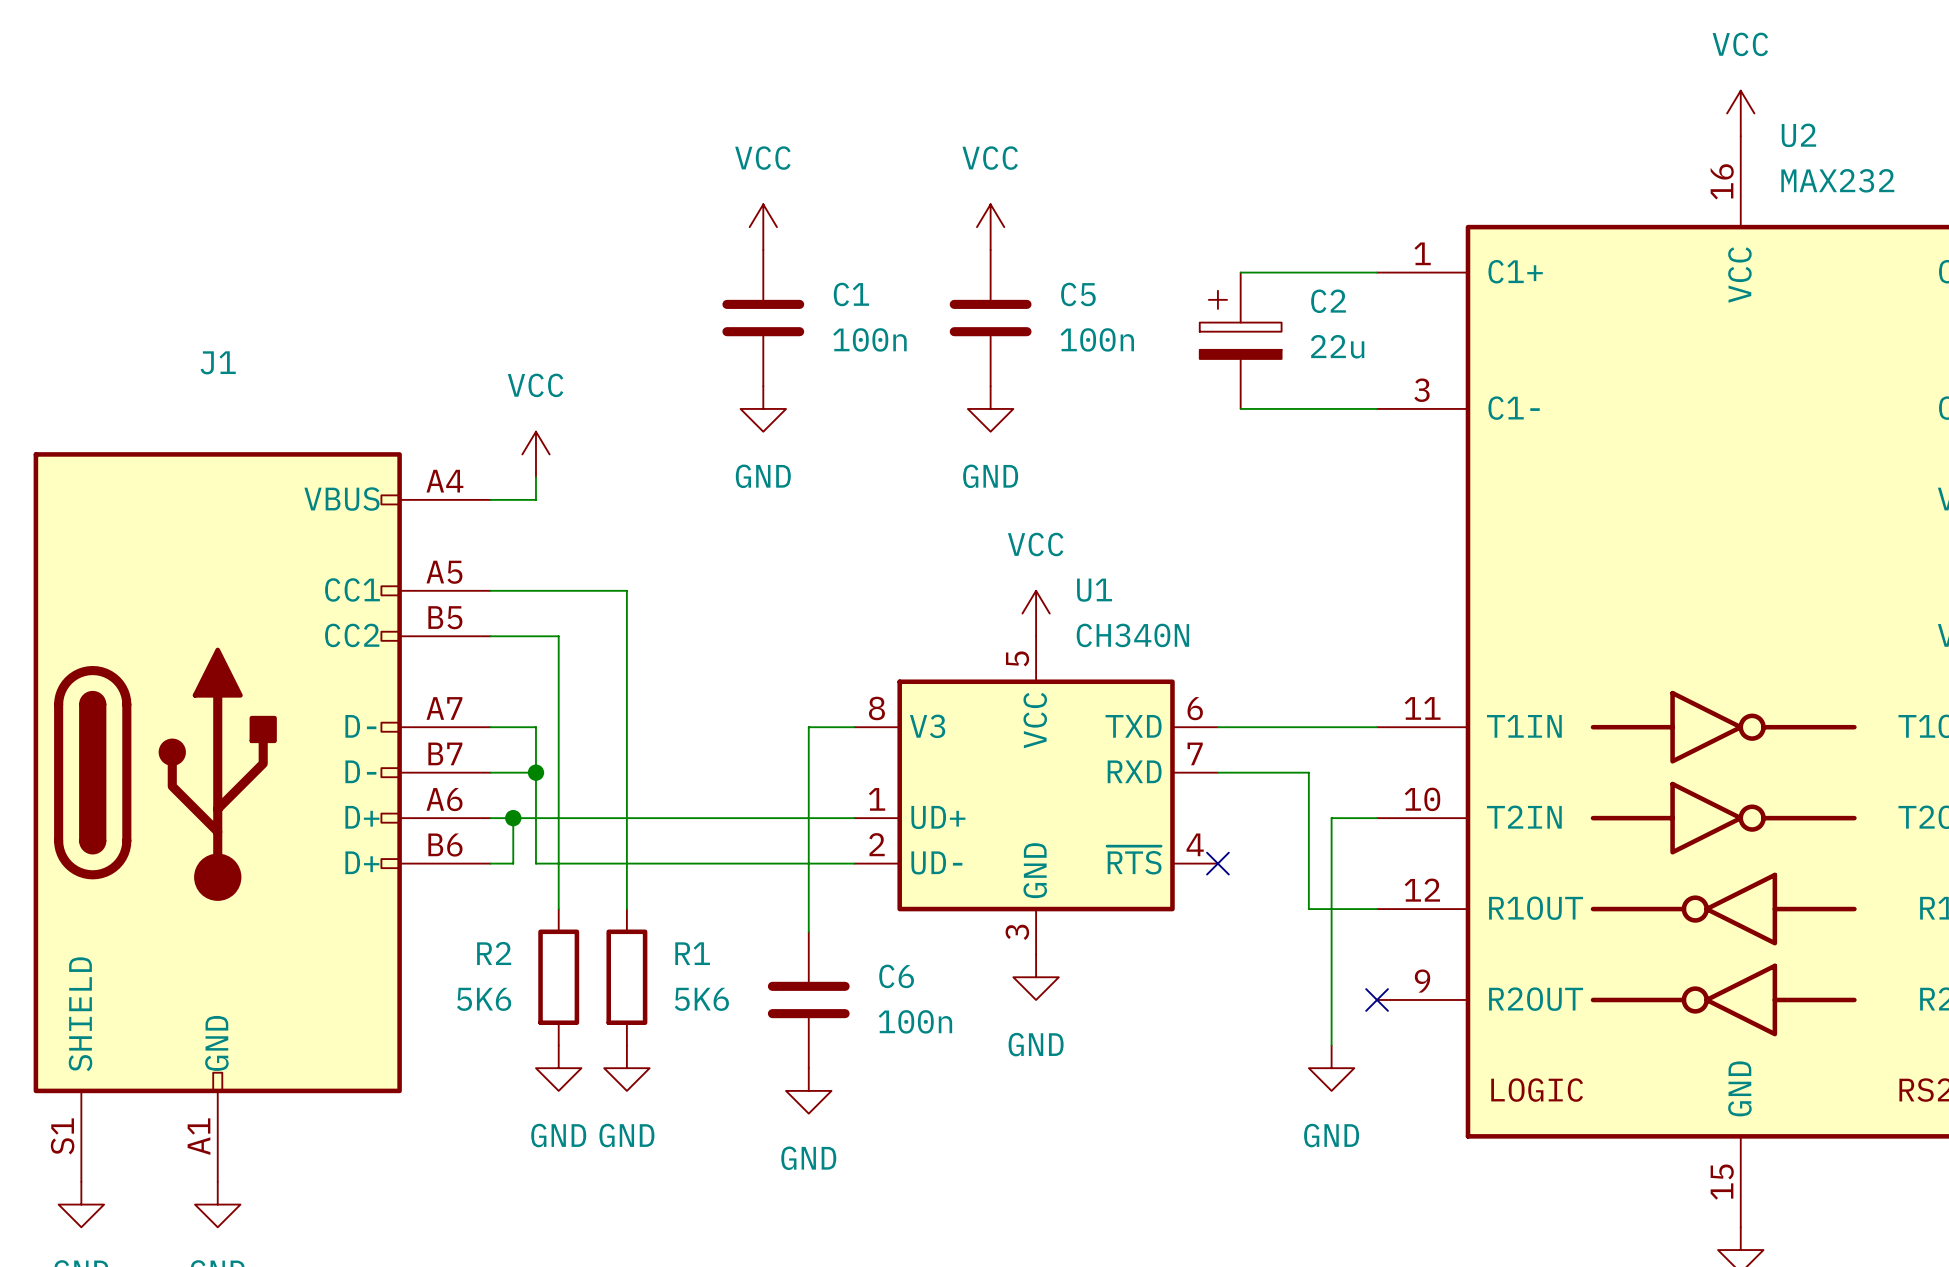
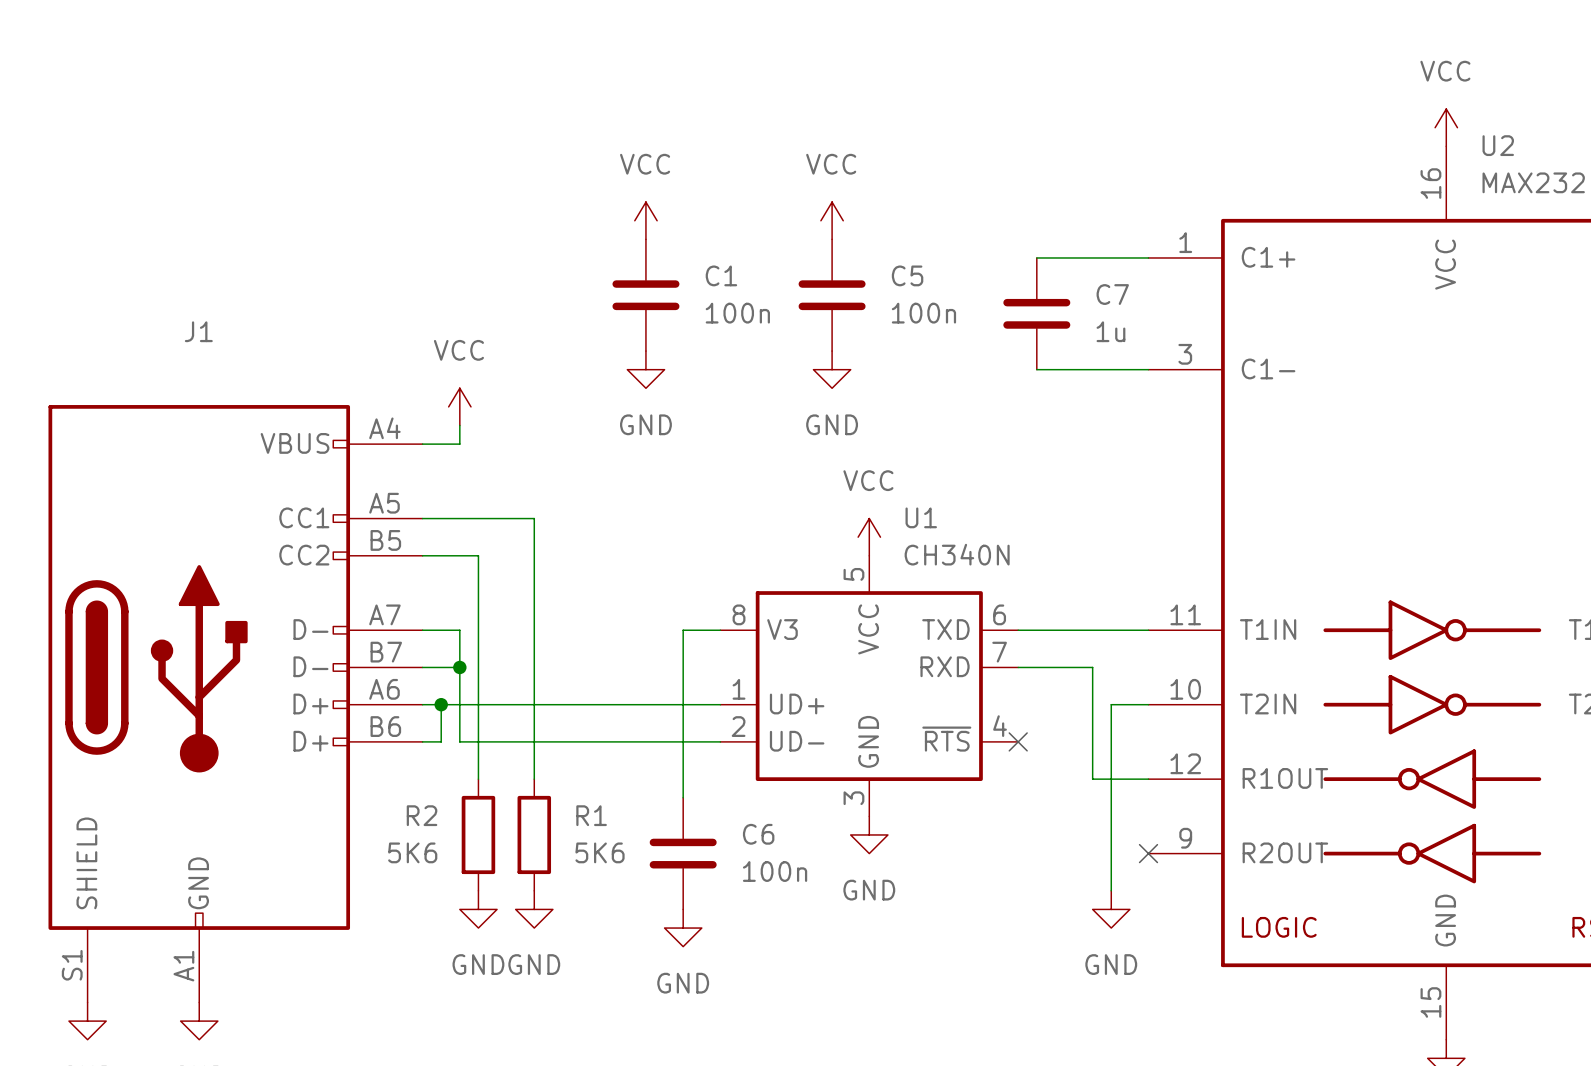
C2: 22u (1240, 340) -> none
C7: none -> 1u (1036, 313)

